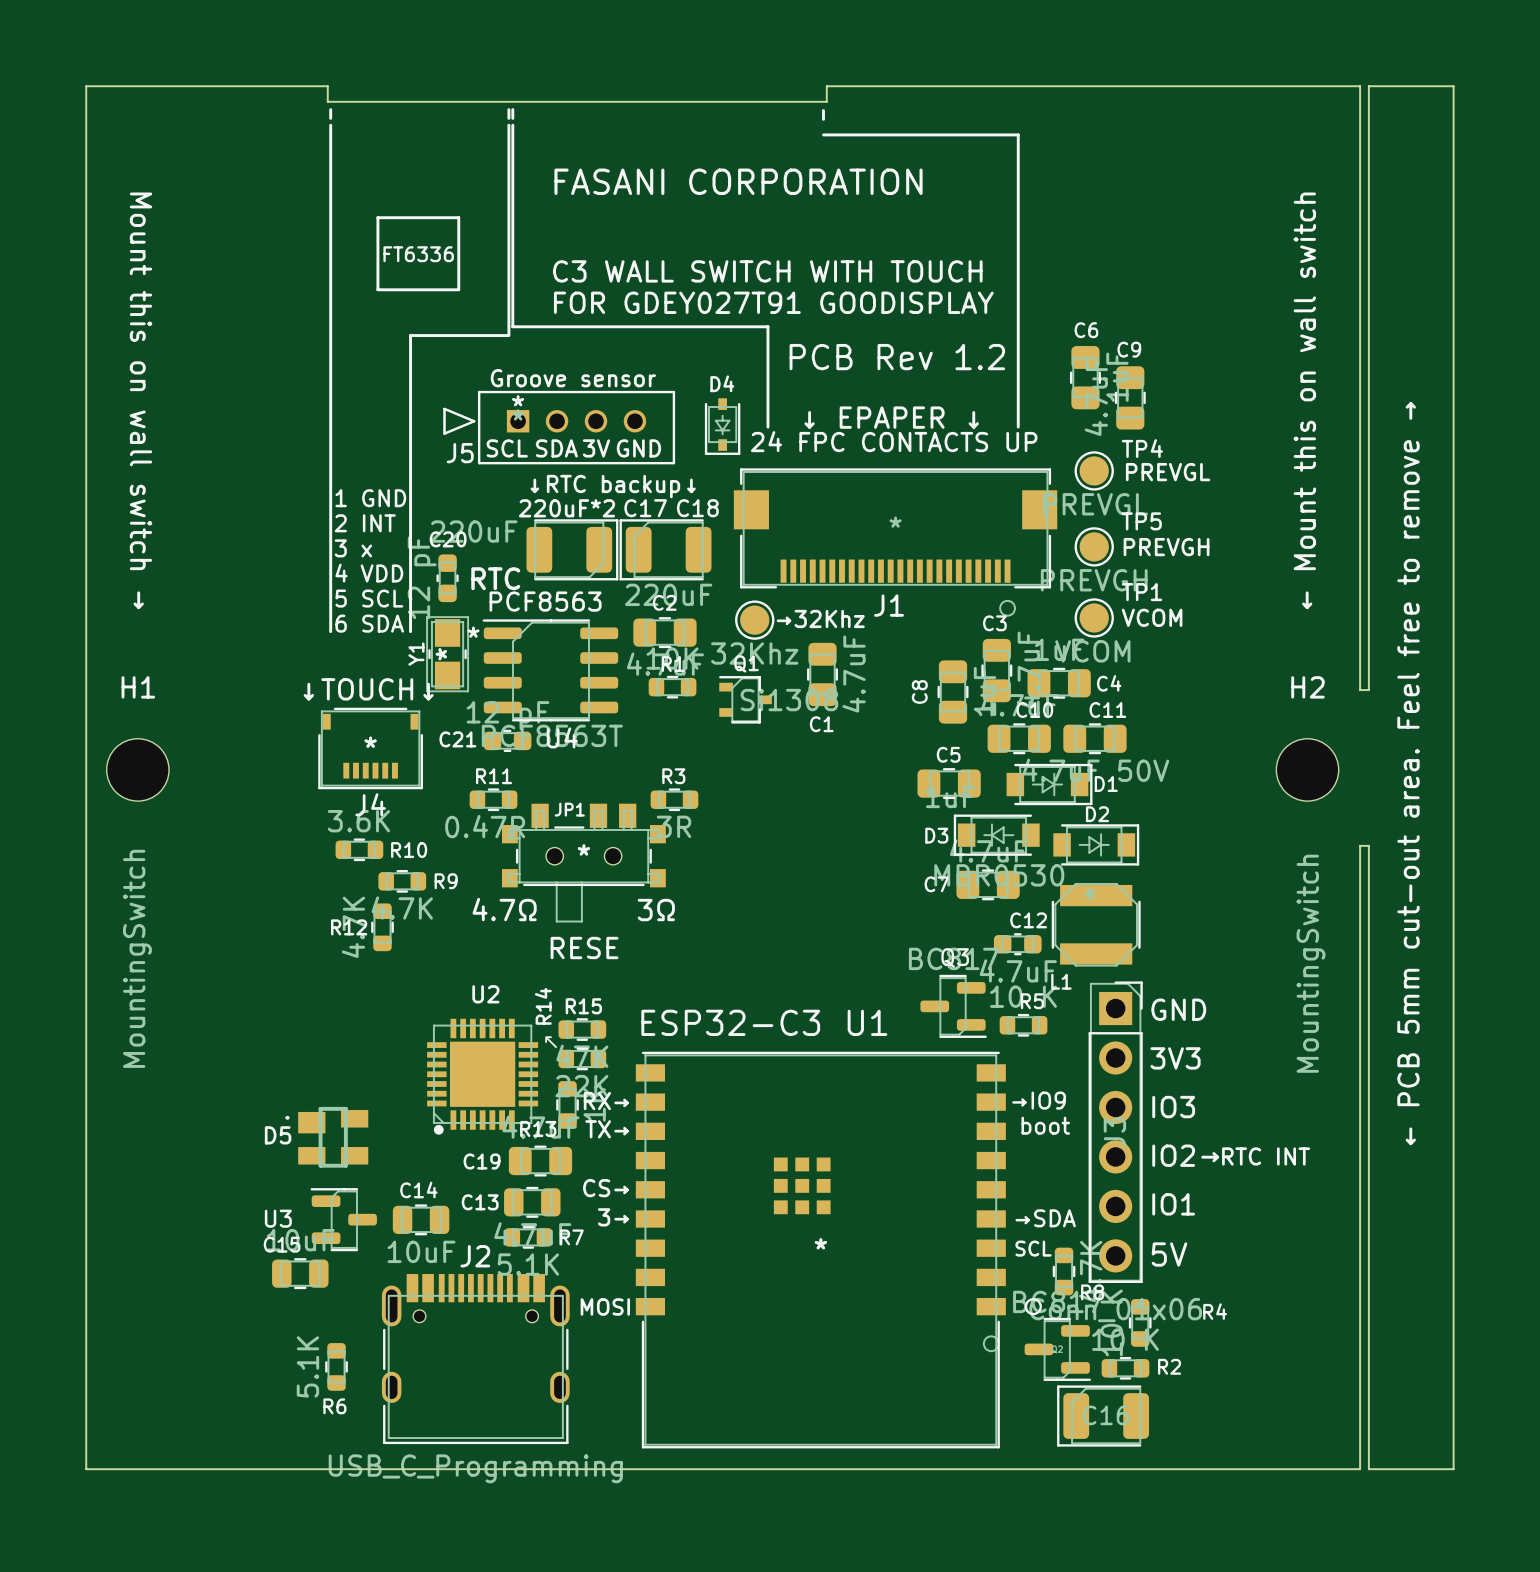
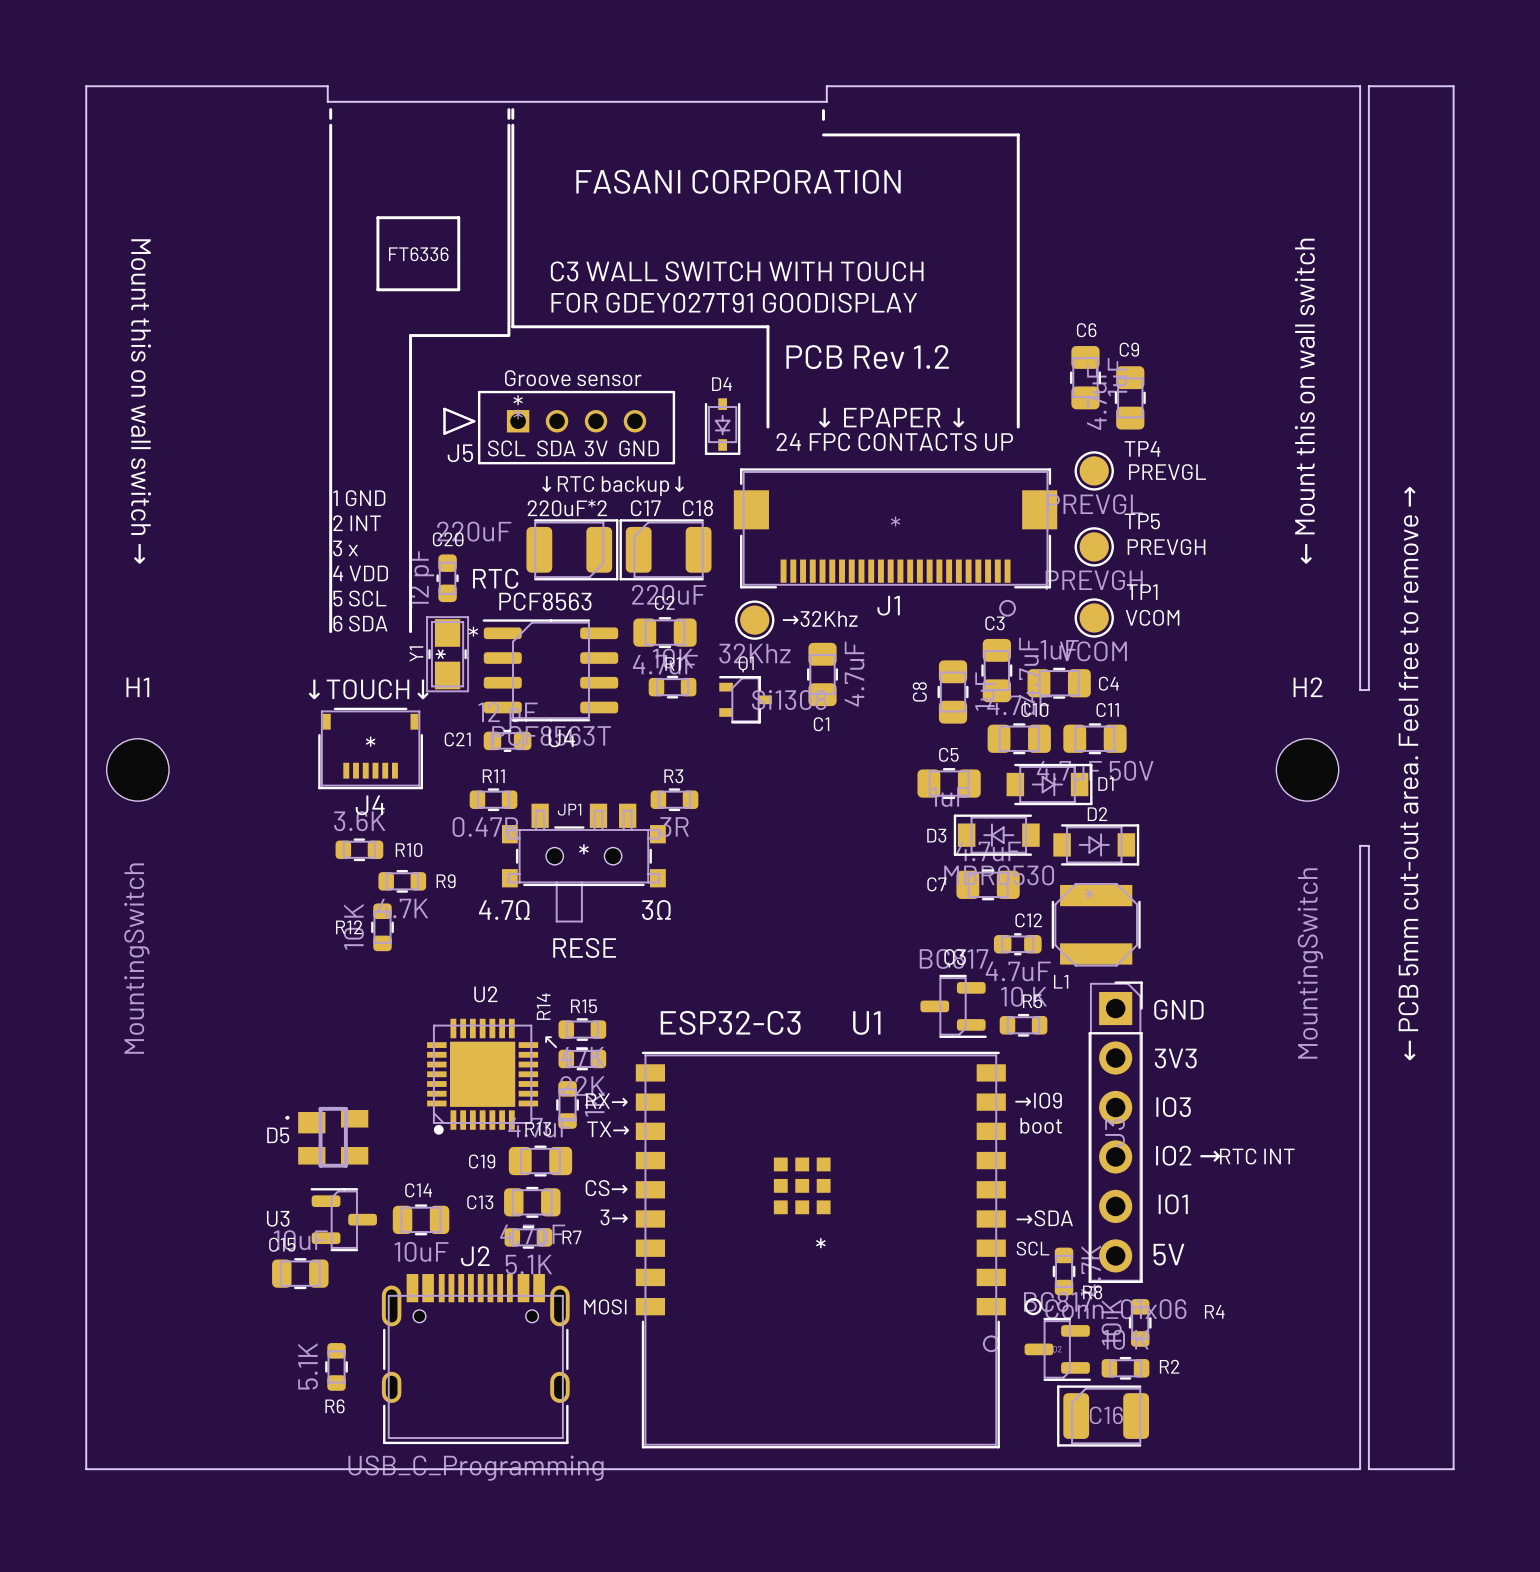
R12 value: 4.7K (353, 927) -> 10 K (353, 926)

